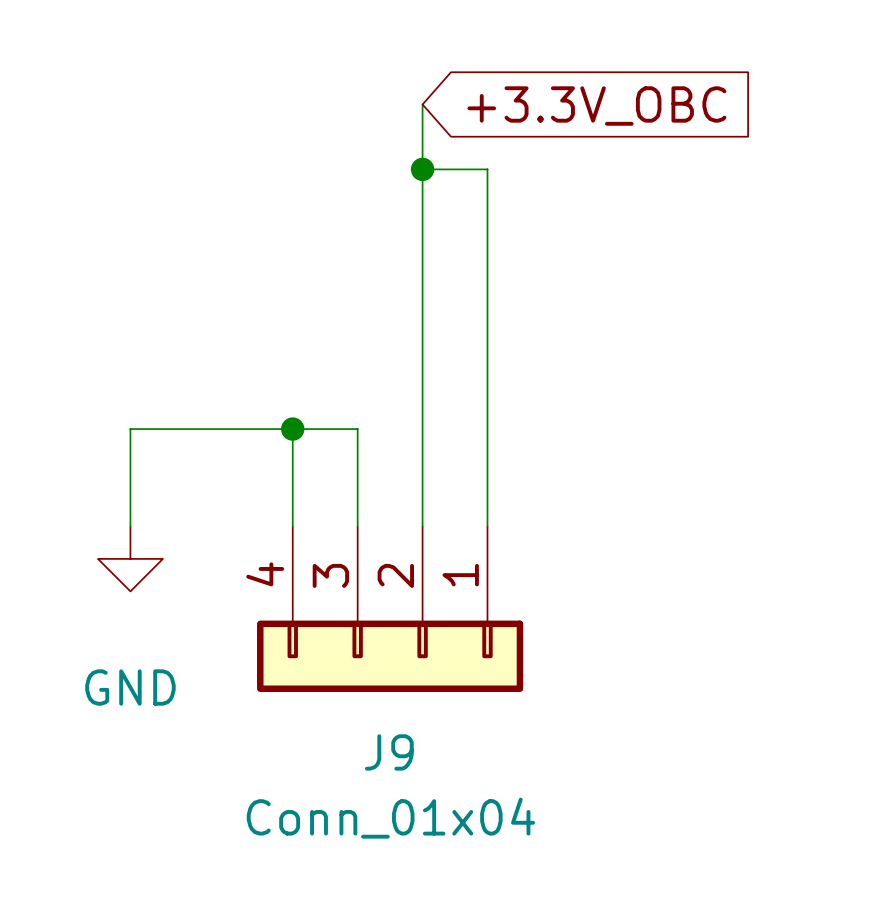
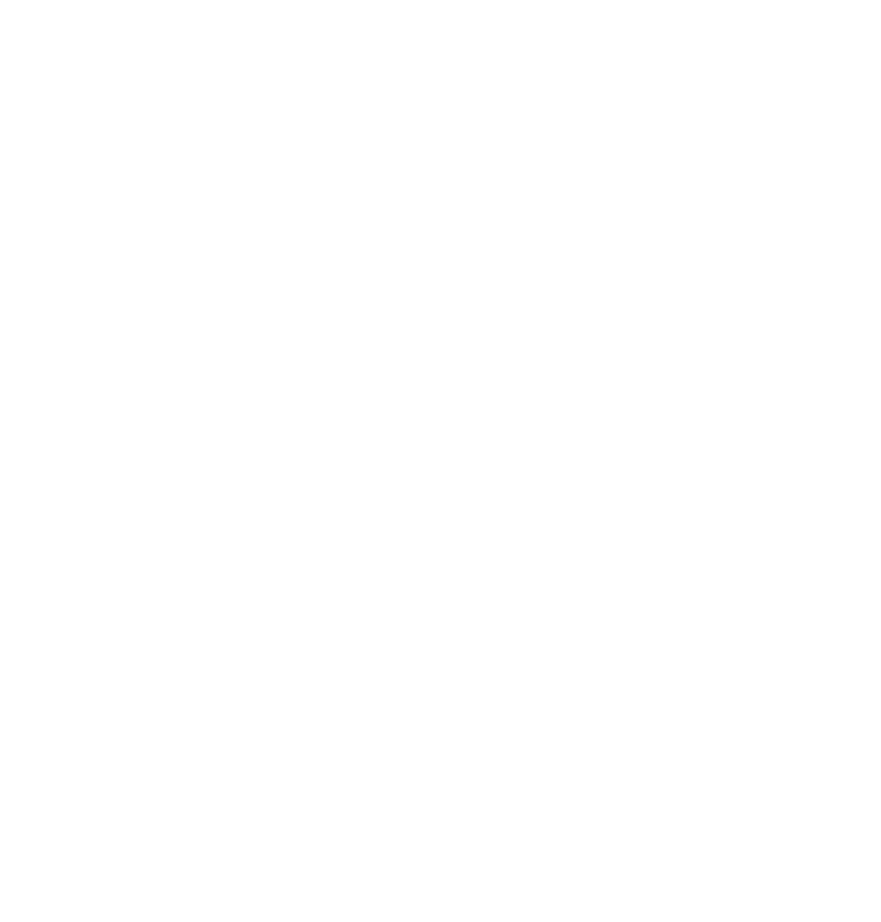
wire: (422, 104) (422, 526) -> none
global label: +3.3V_OBC (596, 106) -> none
wire: (422, 169) (487, 169) (487, 526) -> none
junction: (422, 169) -> none
wire: (292, 429) (292, 526) -> none
junction: (292, 429) -> none
wire: (130, 526) (130, 429) (357, 429) (357, 526) -> none
power symbol: GND (130, 558) -> none
J9: Conn_01x04 (390, 609) -> none

